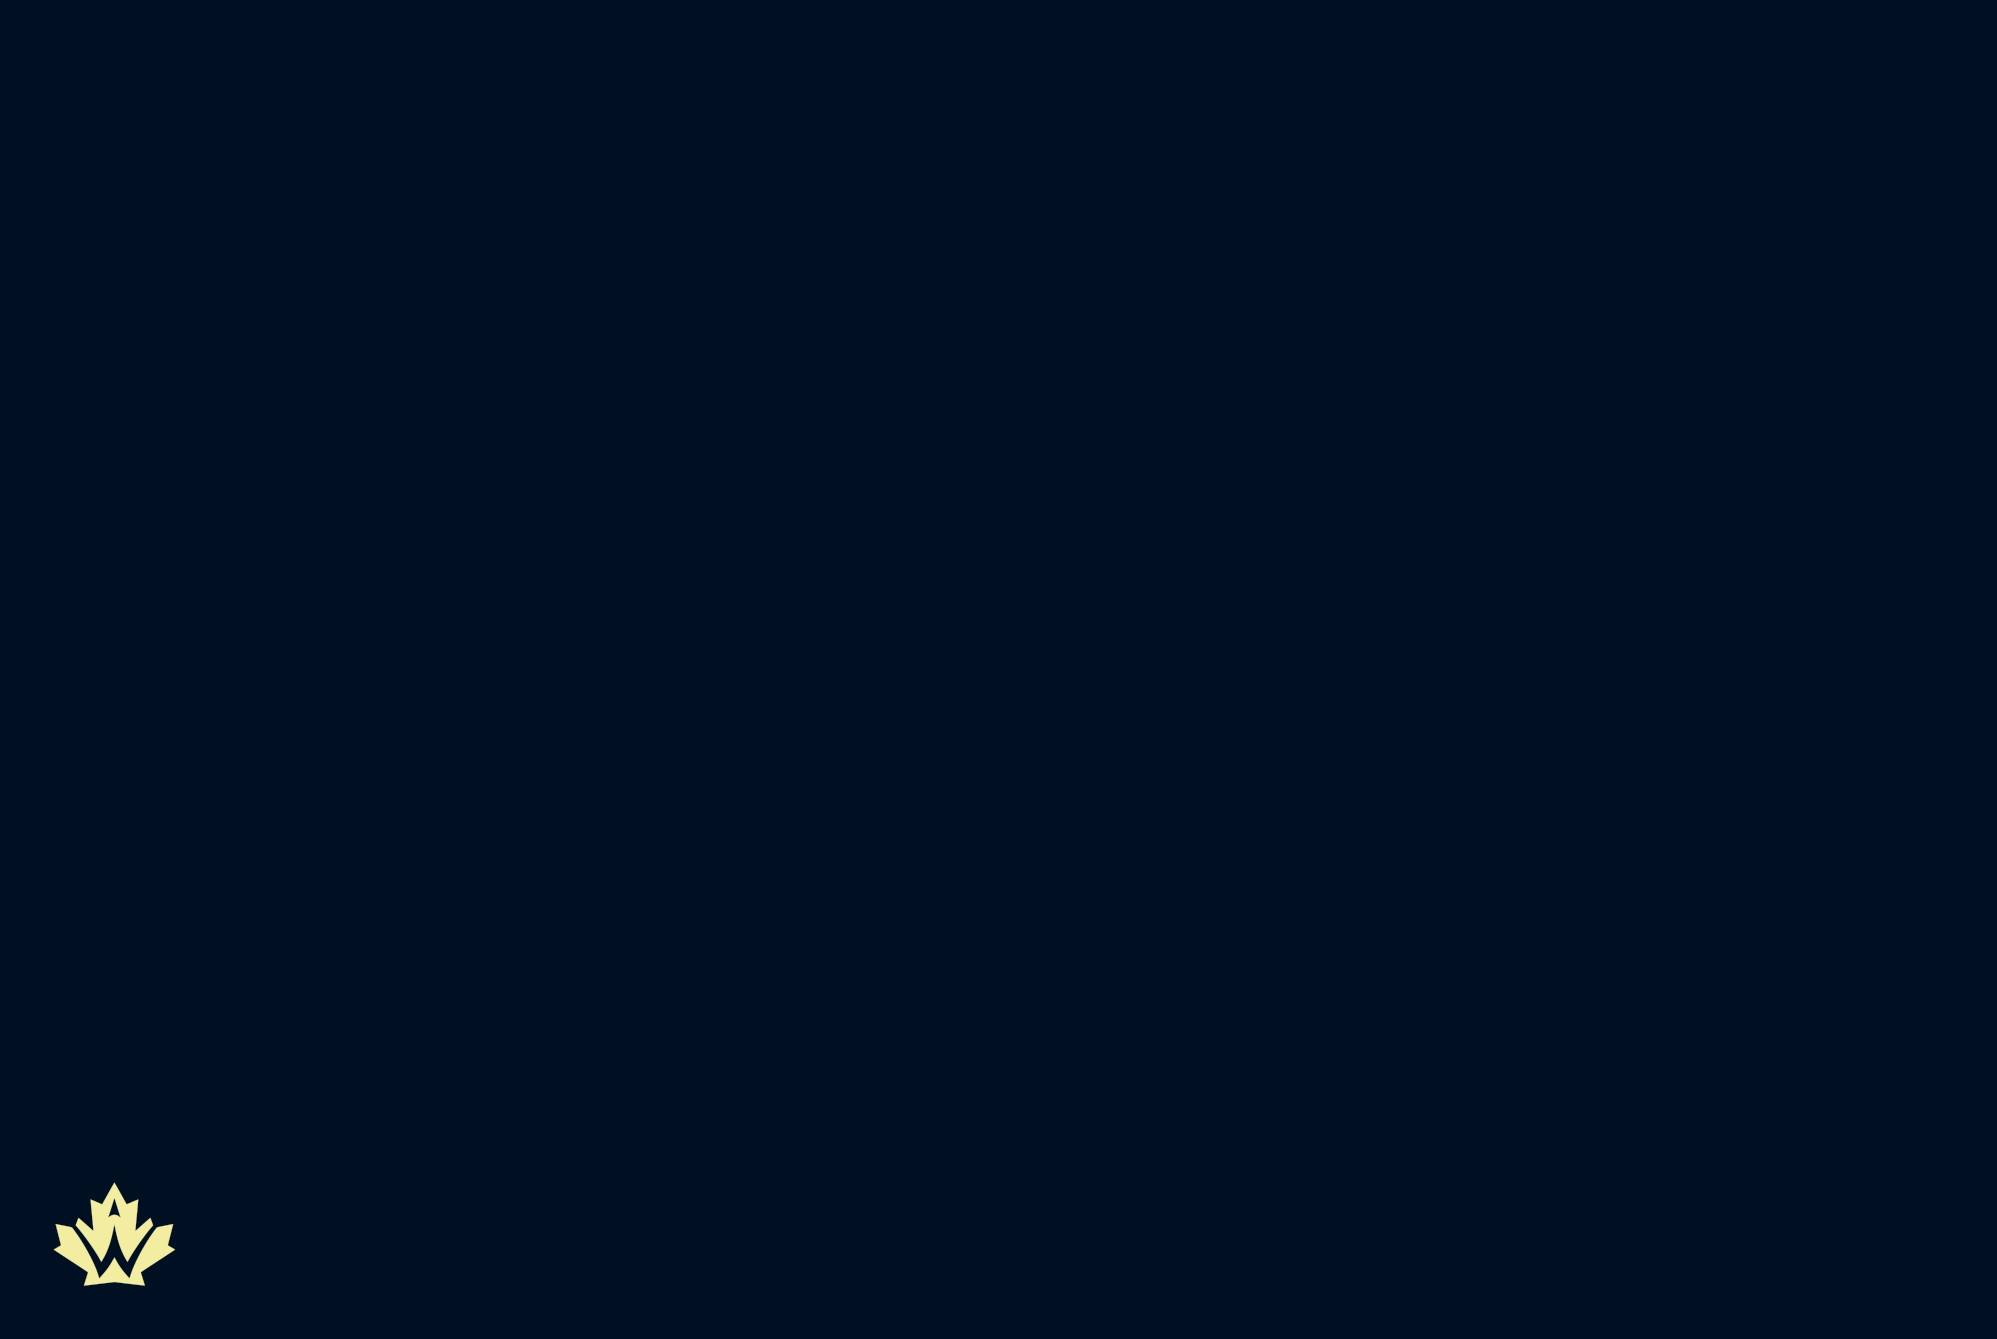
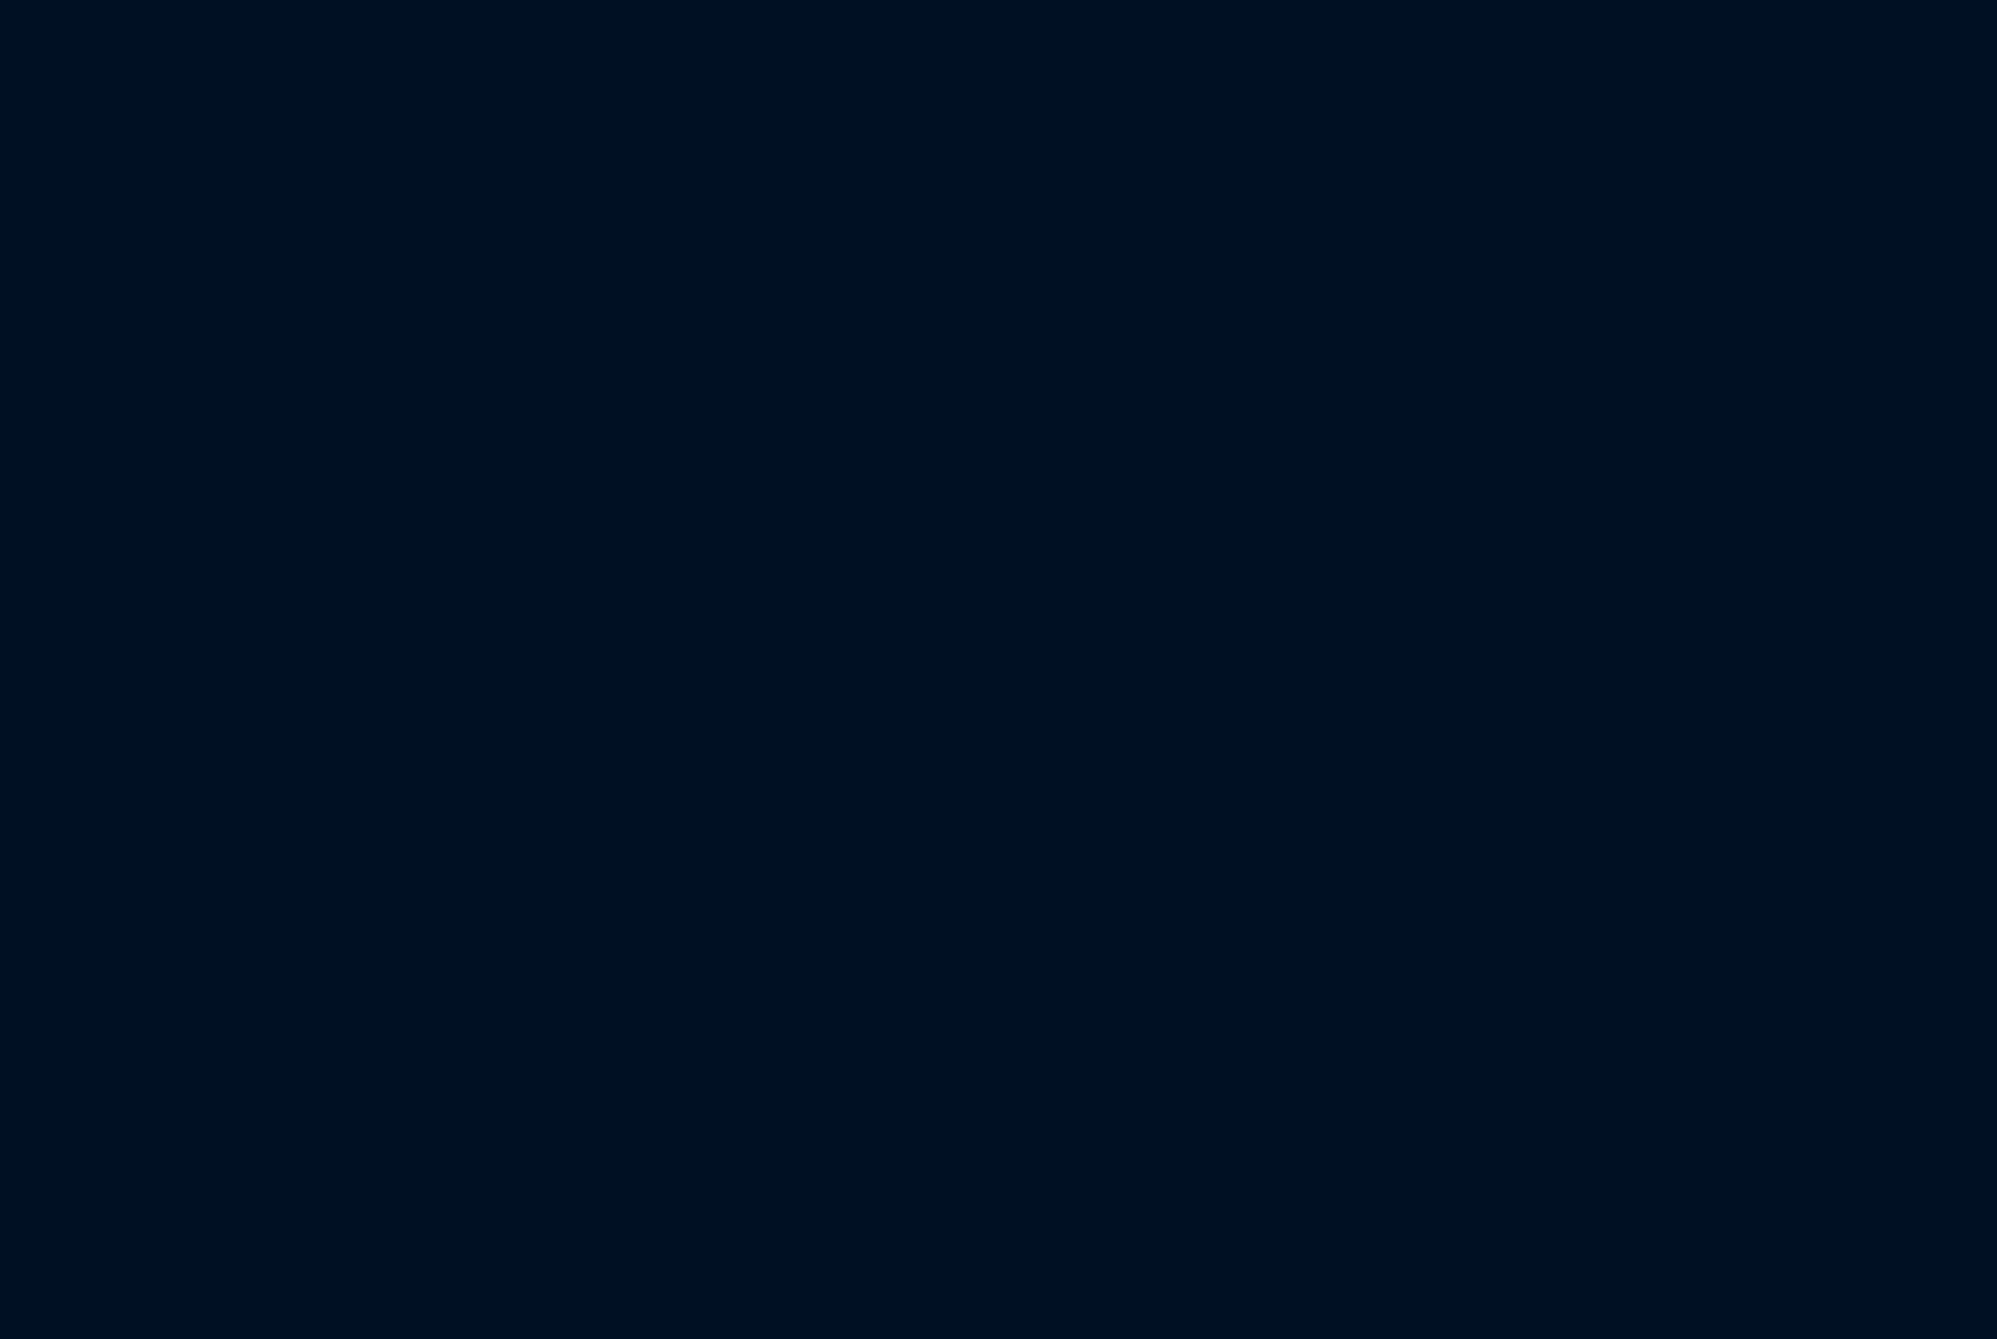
drawing: [53, 1182, 176, 1286] -> none

